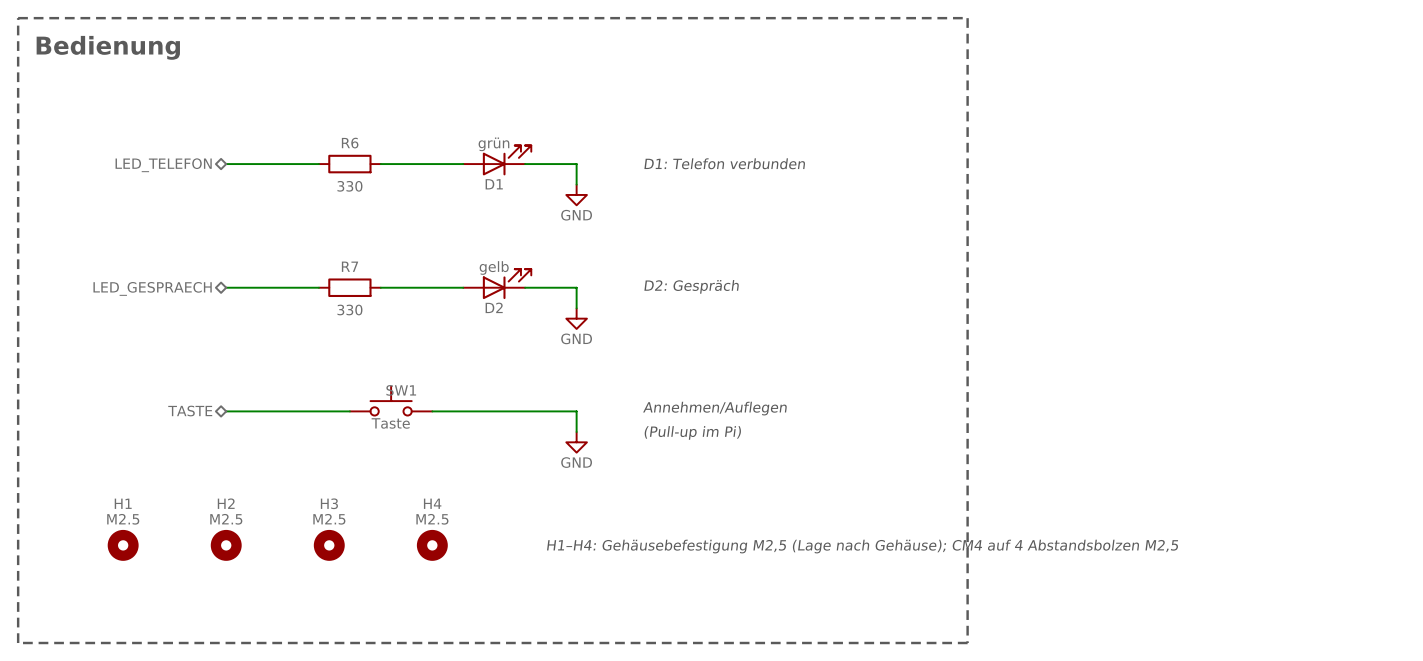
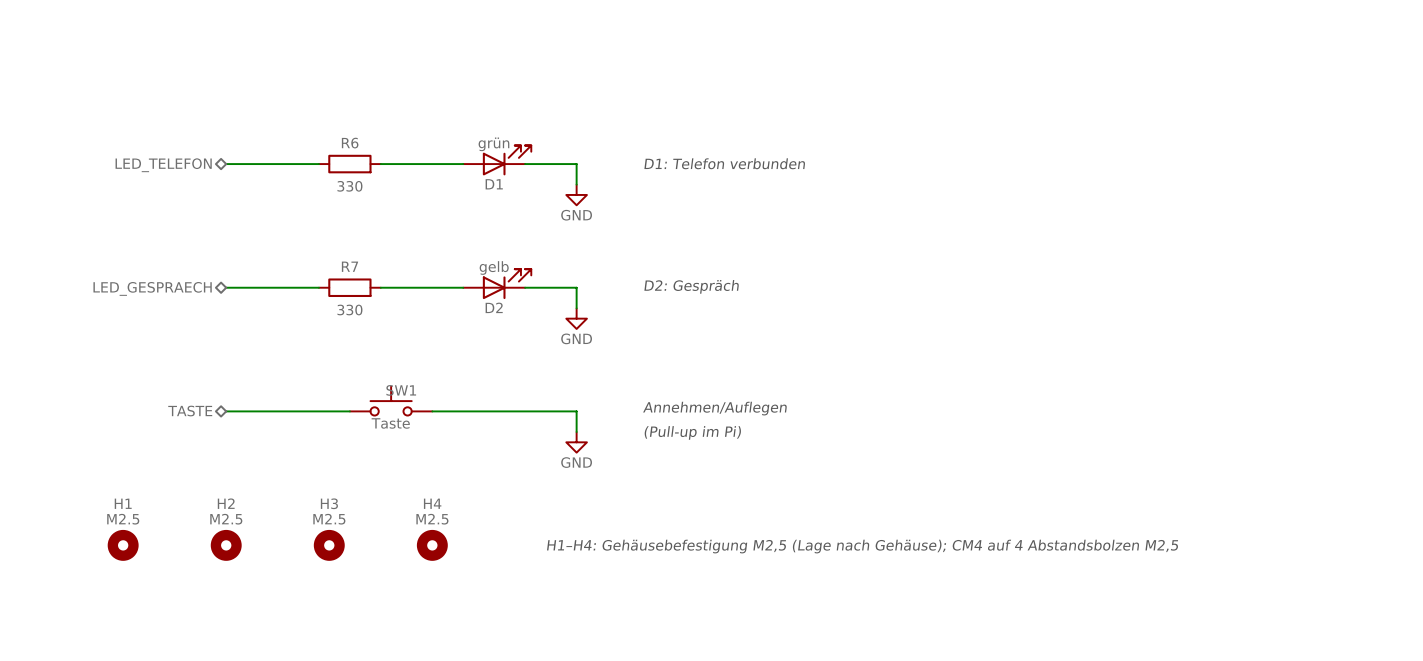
line: (18, 18) (967, 18) (967, 643) (18, 643) (18, 18) -> none
text: Bedienung (108, 47) -> none

